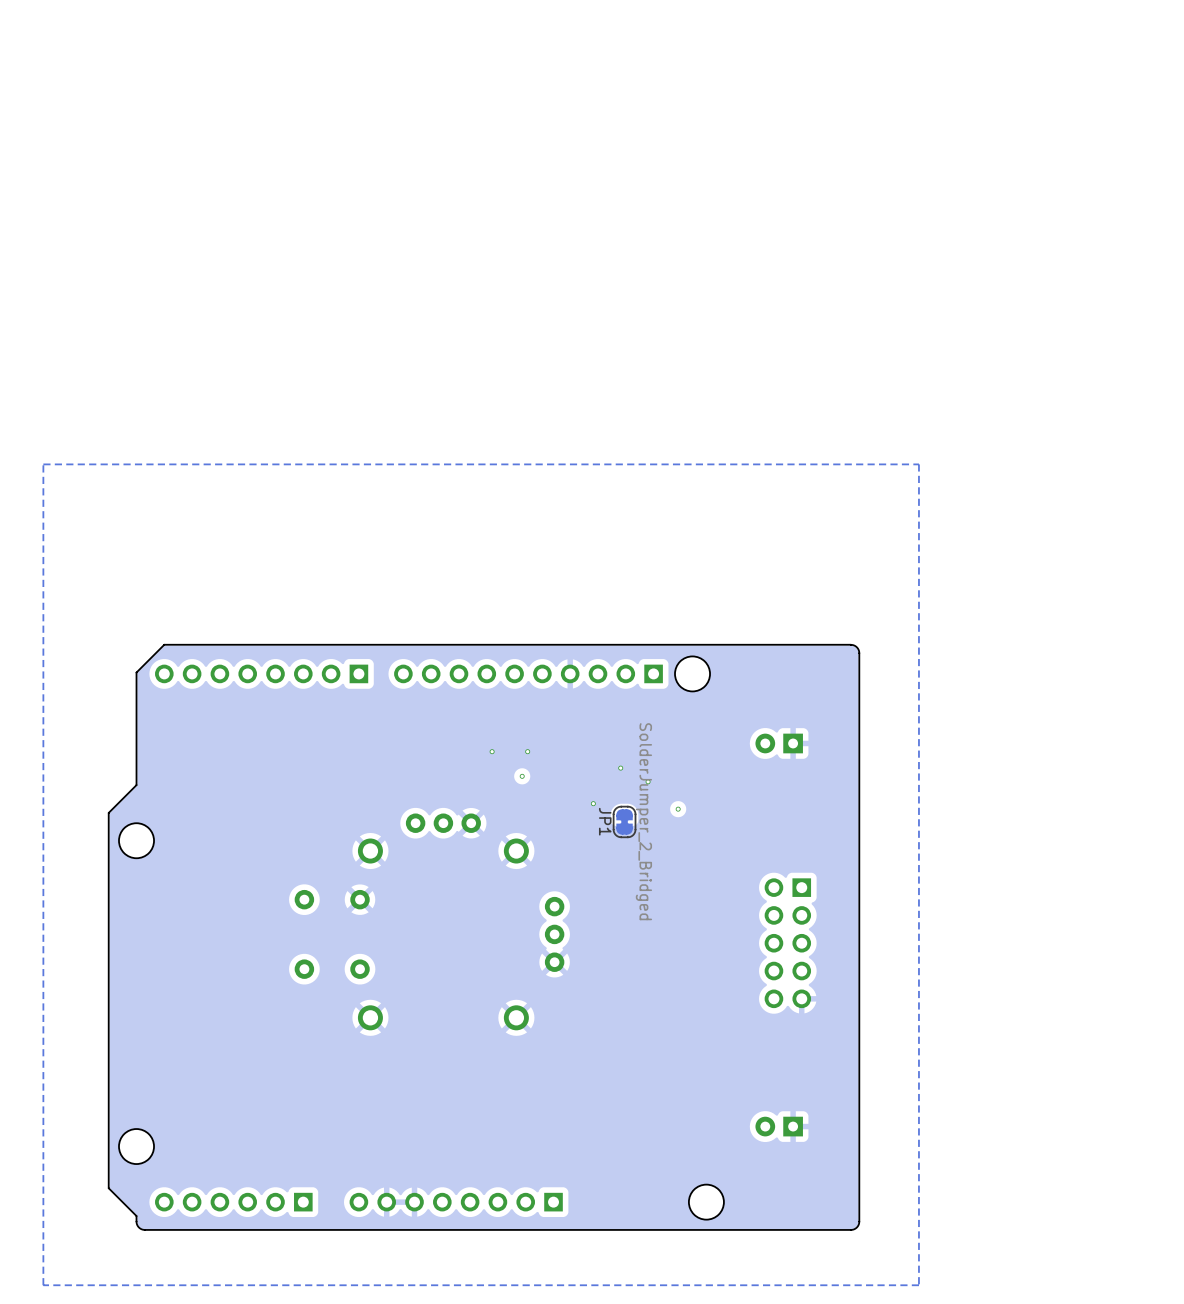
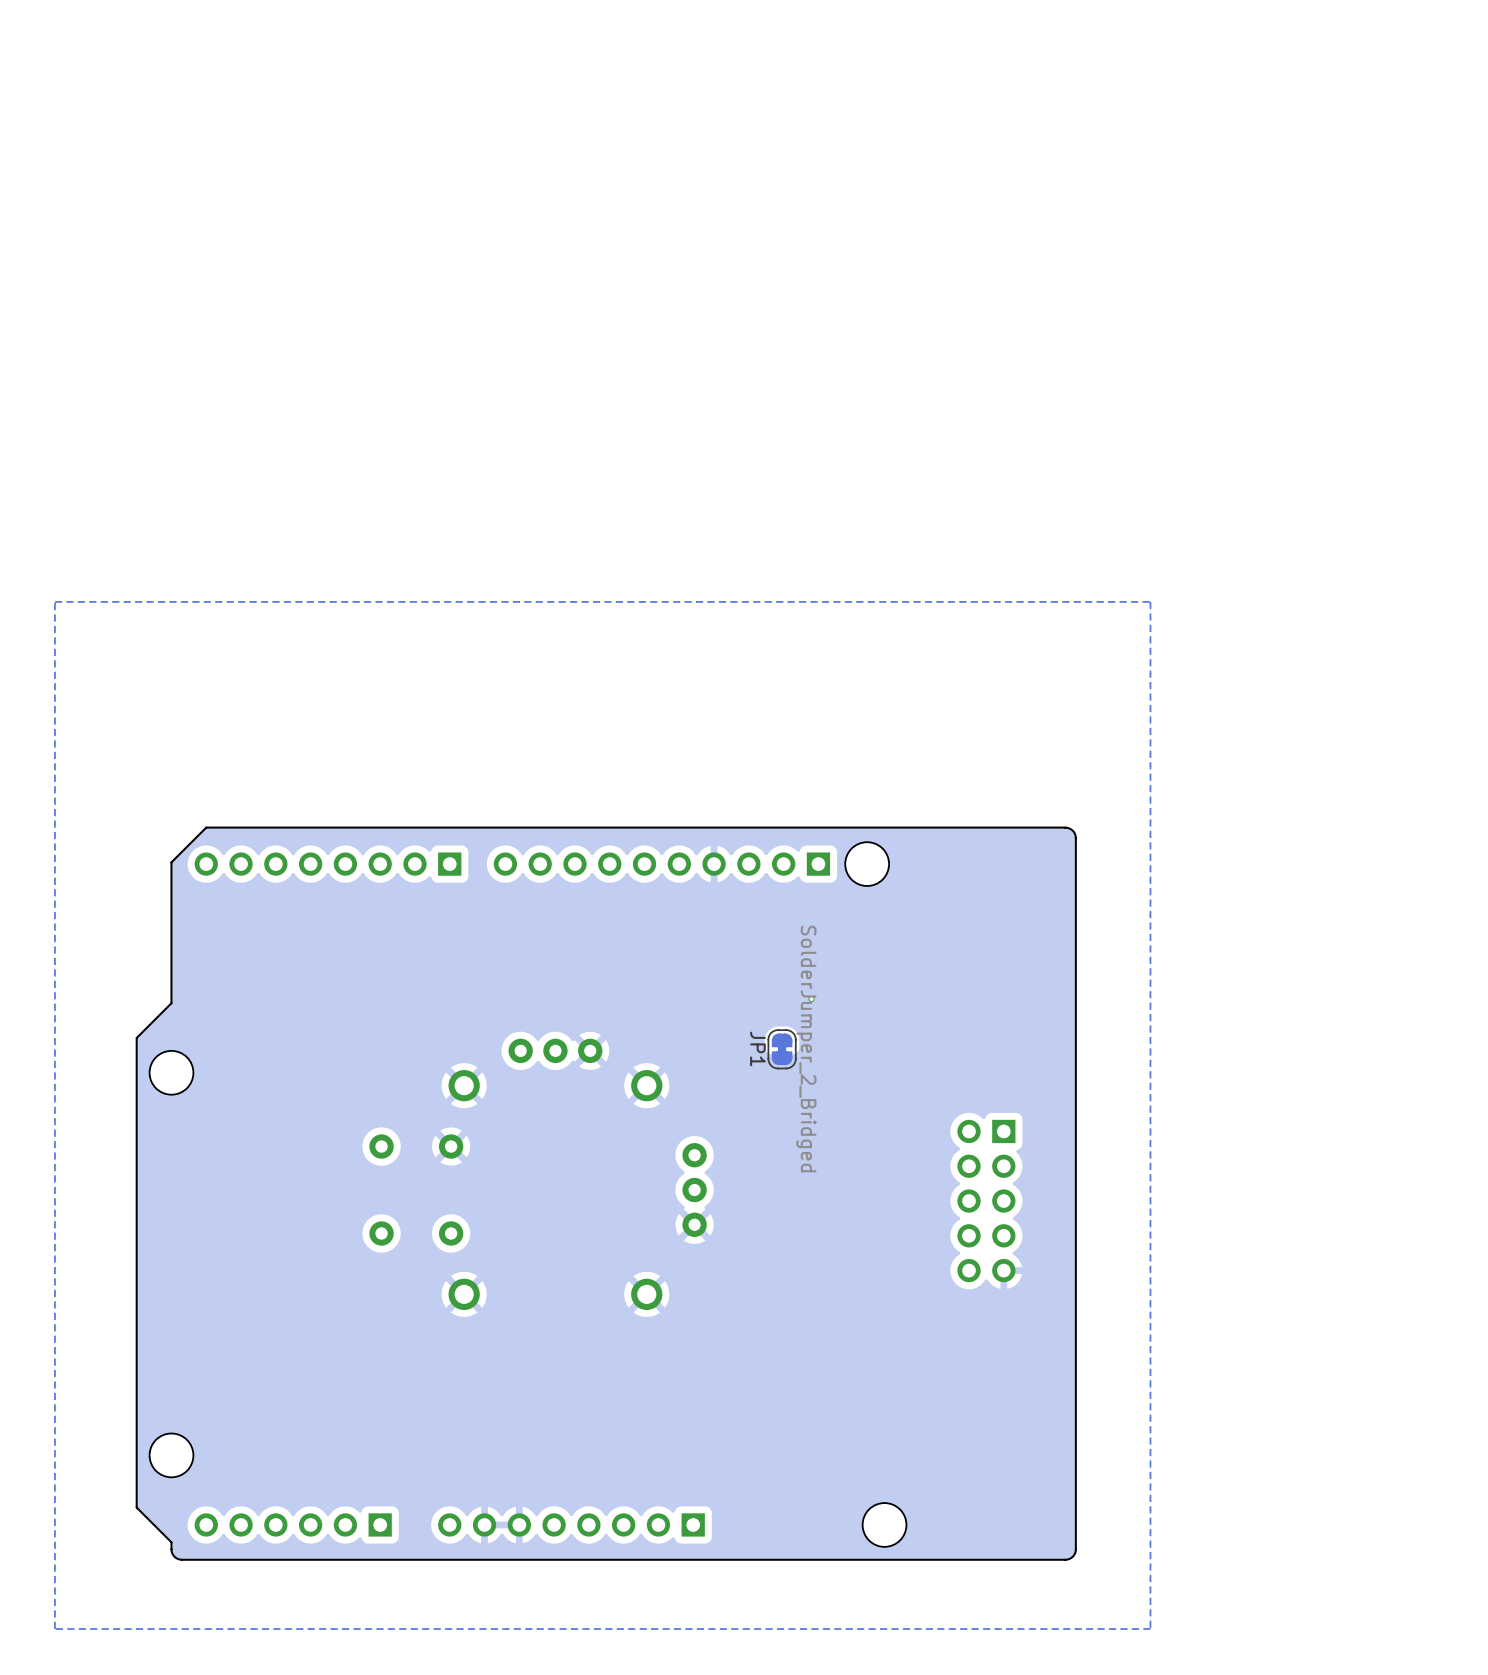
part: (779, 743) -> none
via: (492, 751) -> none
via: (527, 751) -> none
via: (620, 768) -> none
via: (522, 776) -> none
via: (593, 803) -> none
via: (678, 809) -> none
part: (779, 1126) -> none

